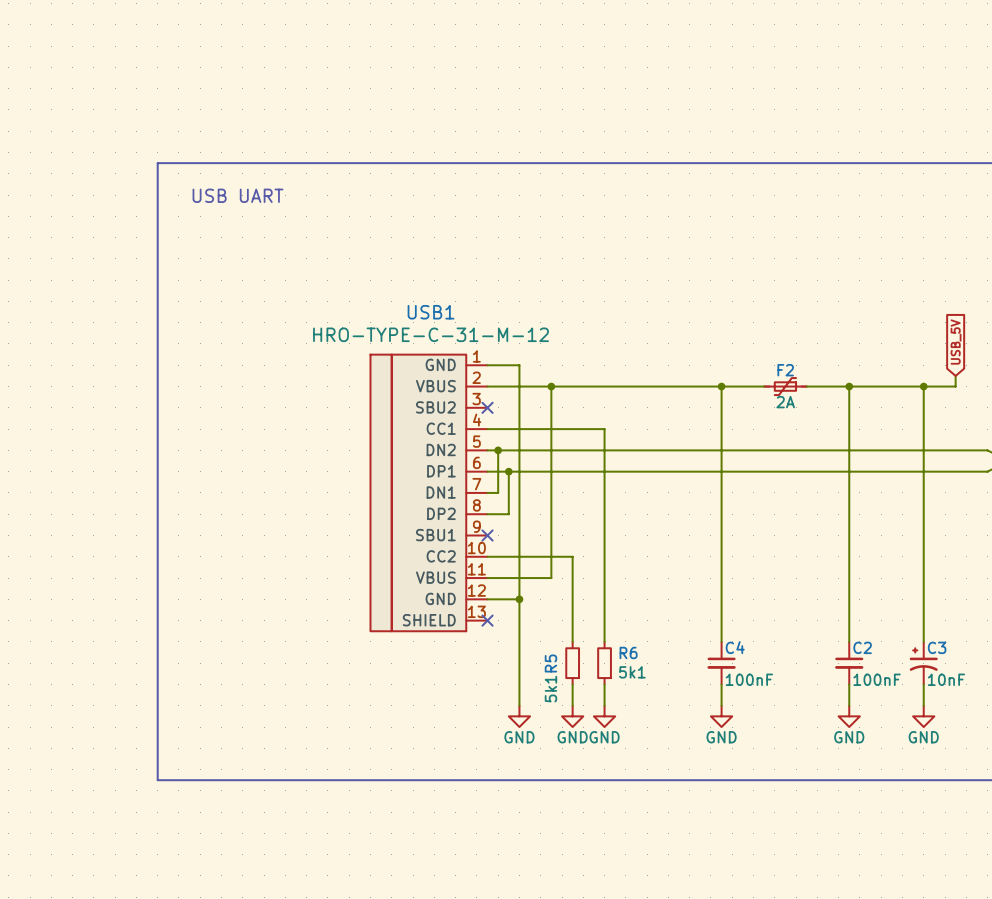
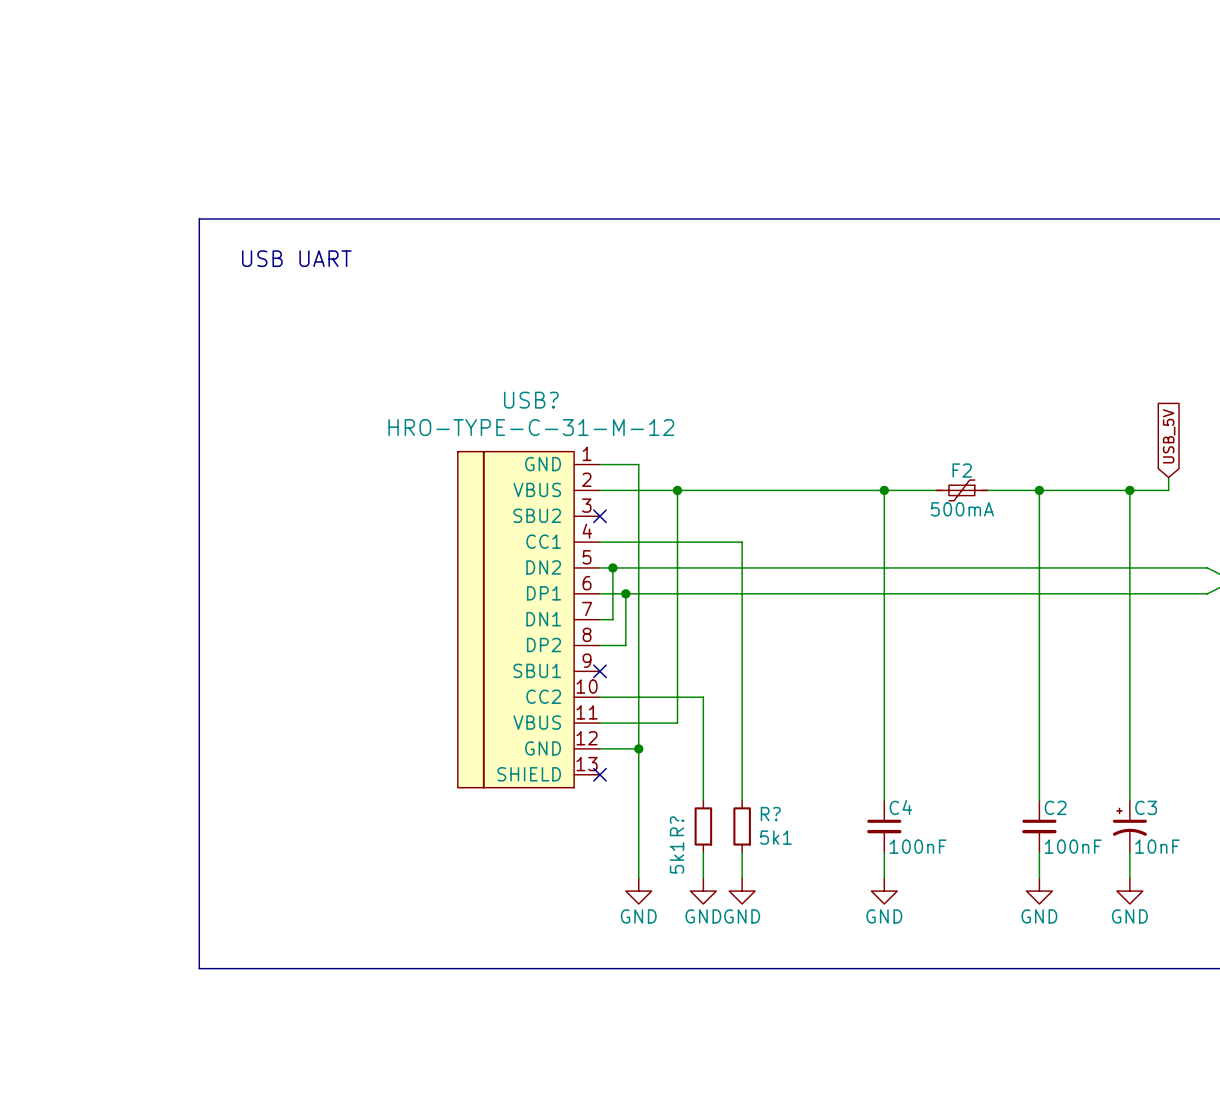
USB1 name: USB1 (431, 312) -> USB? (531, 400)
F2 value: 2A (785, 402) -> 500mA (962, 509)
R6 name: R6 (628, 652) -> R? (770, 814)
R5 name: R5 (550, 663) -> R? (677, 826)

